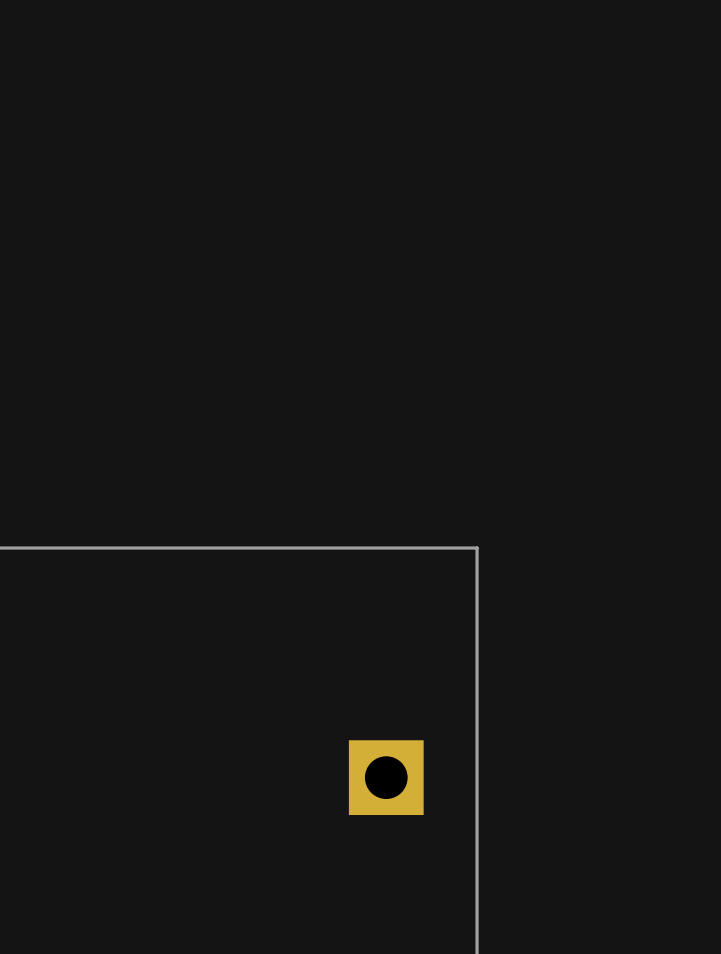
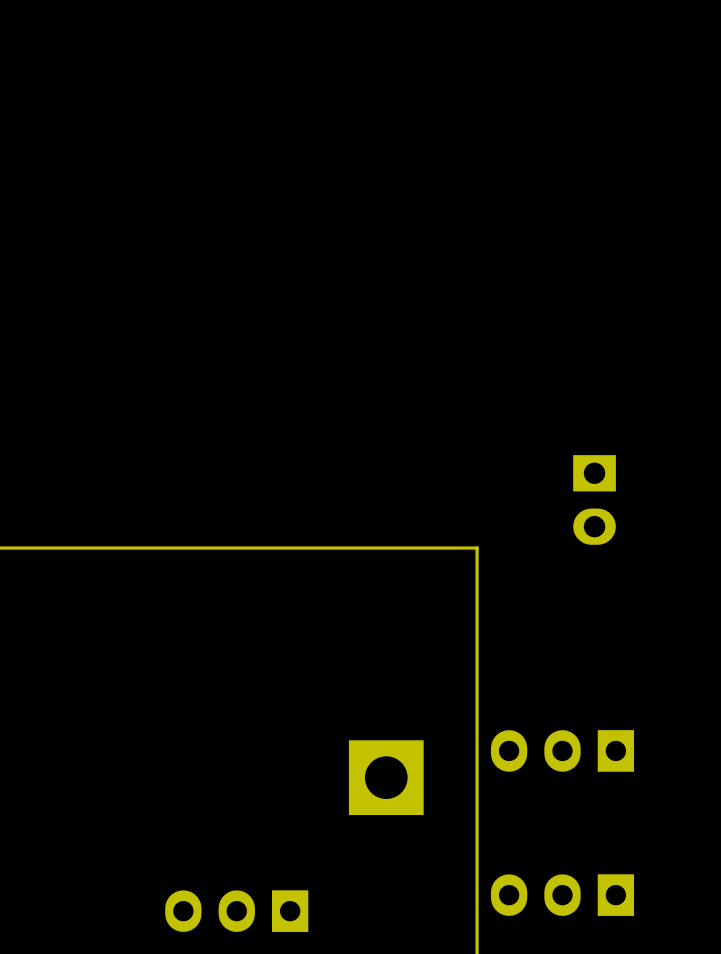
part: none -> (594, 499)
part: none -> (562, 750)
part: none -> (562, 895)
part: none -> (236, 911)

